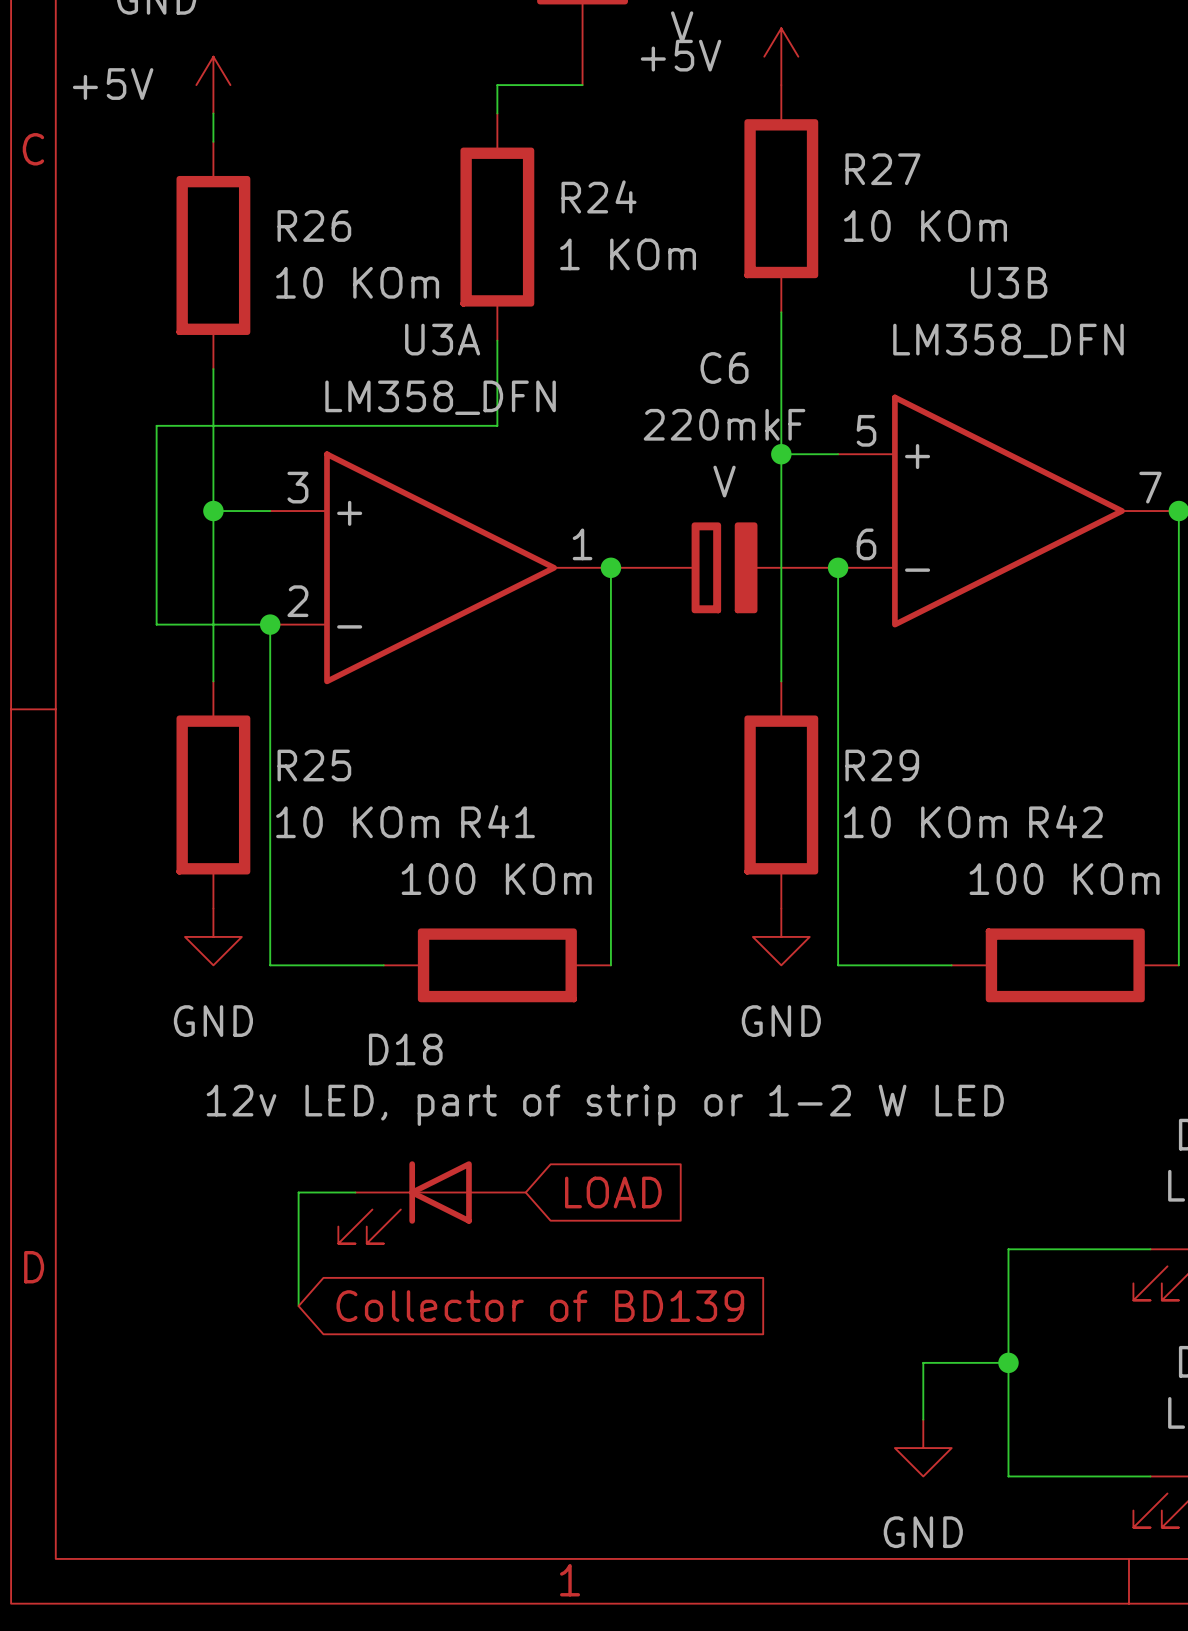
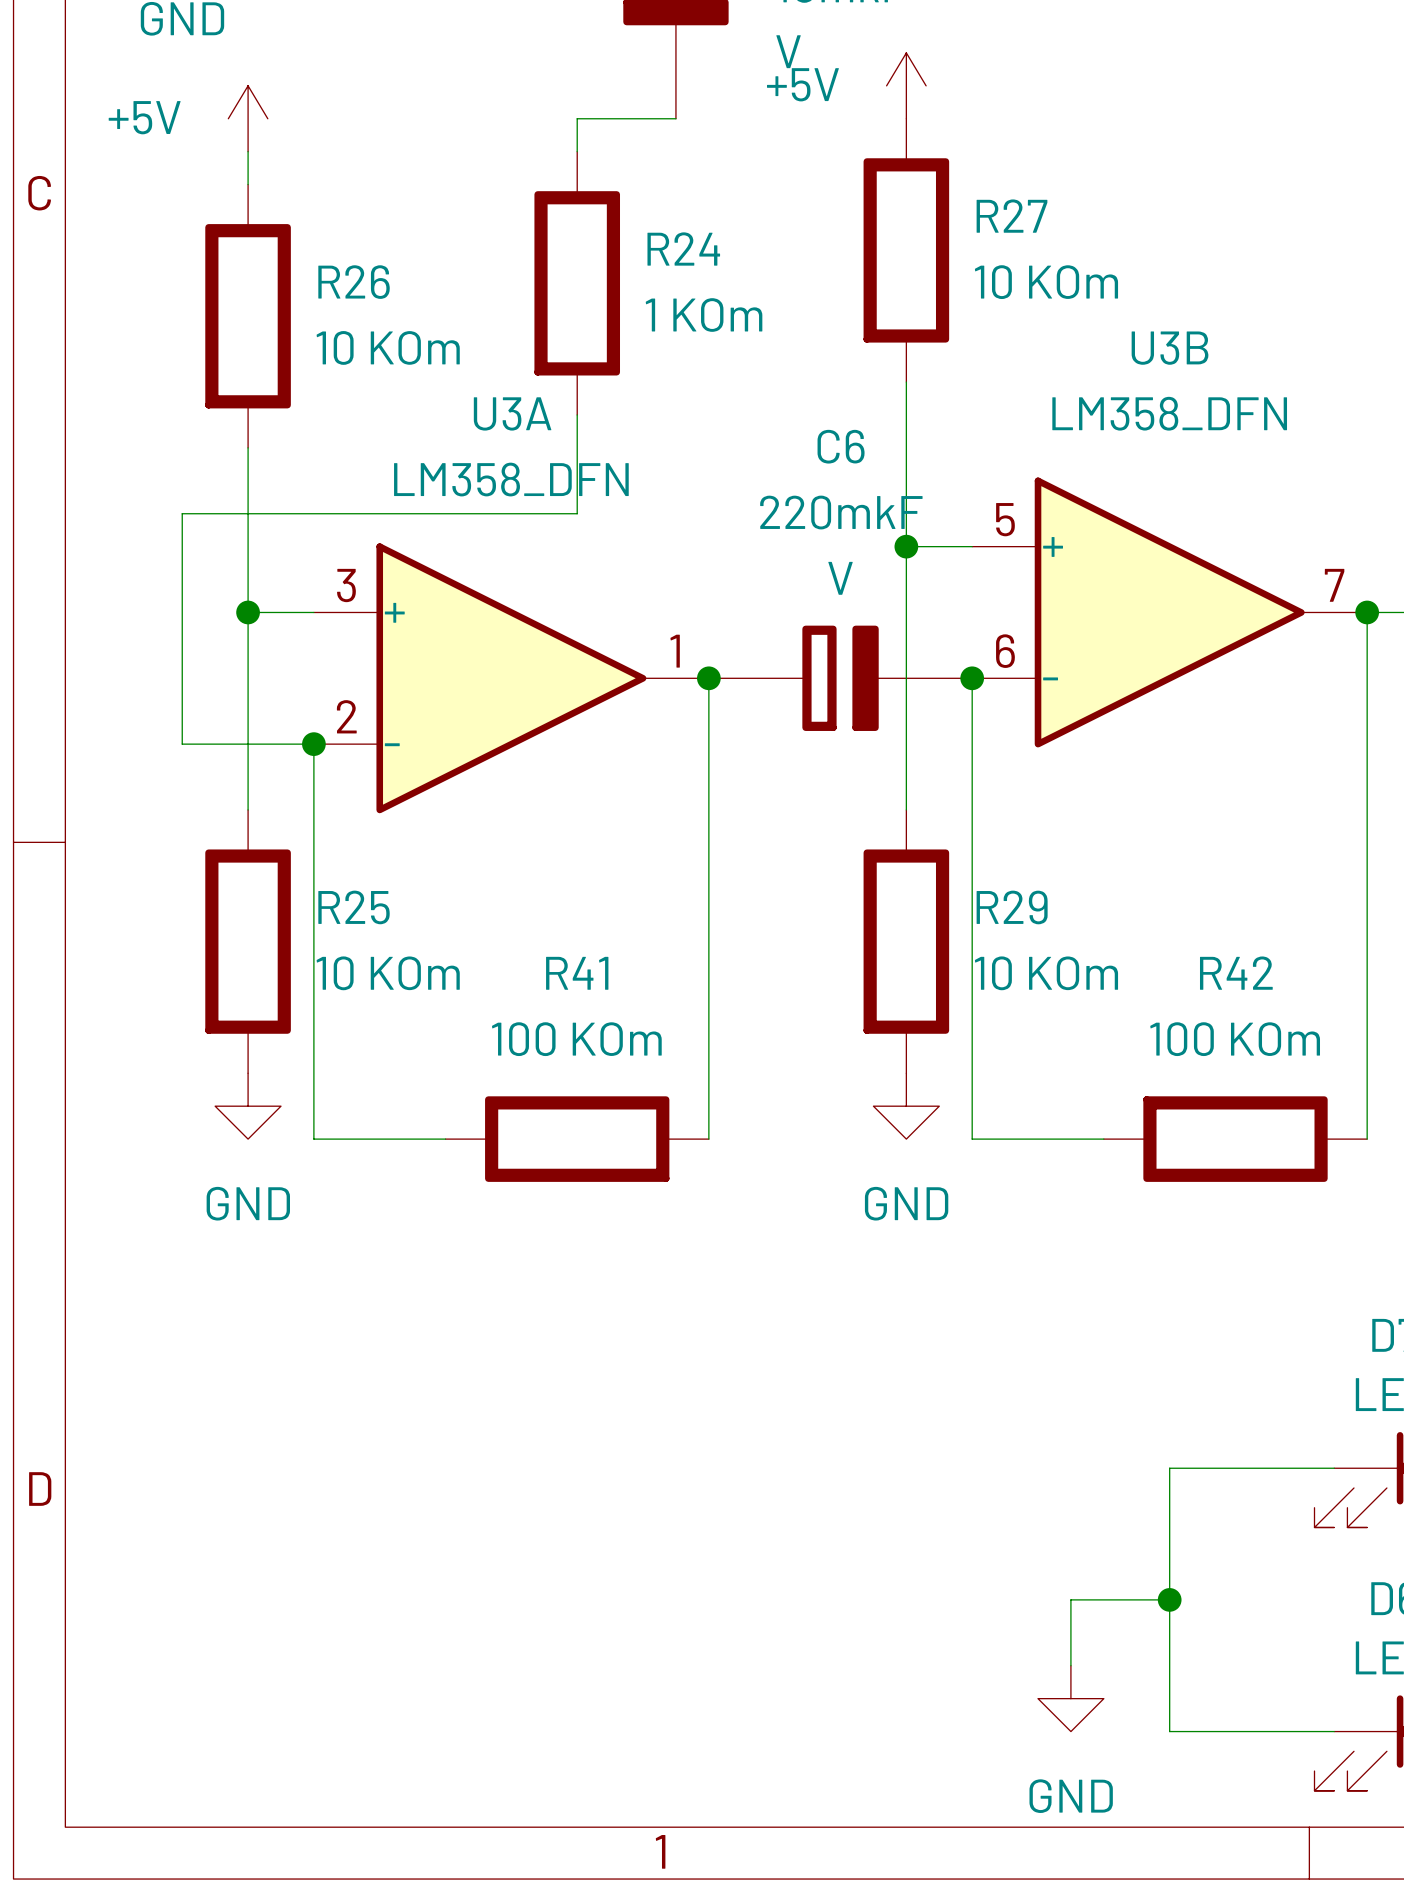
wire: (355, 1192) (298, 1192) (298, 1306) -> none
global label: LOAD (613, 1192) -> none
D18: 12v LED, part of strip or 1-2 W LED (432, 1202) -> none
global label: Collector of BD139 (540, 1306) -> none

